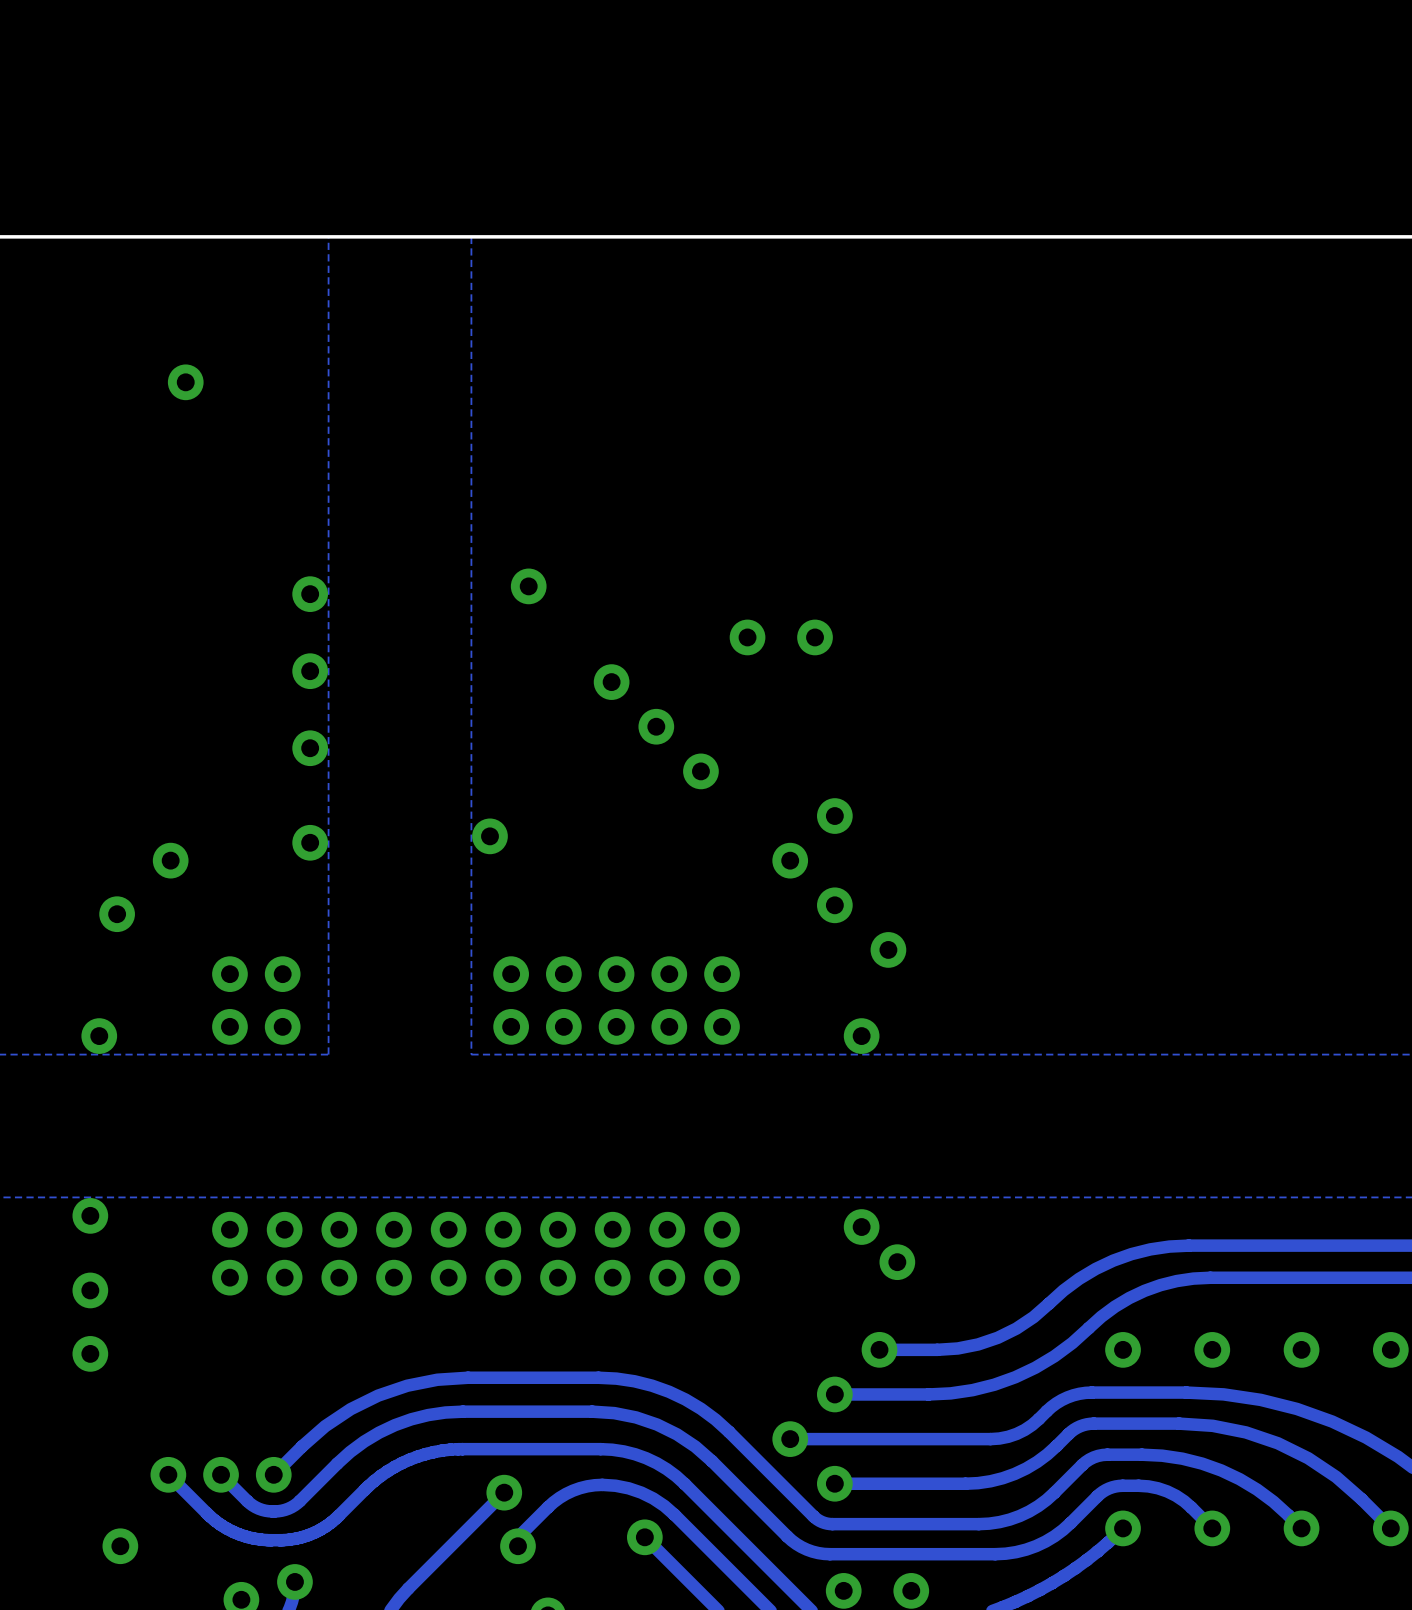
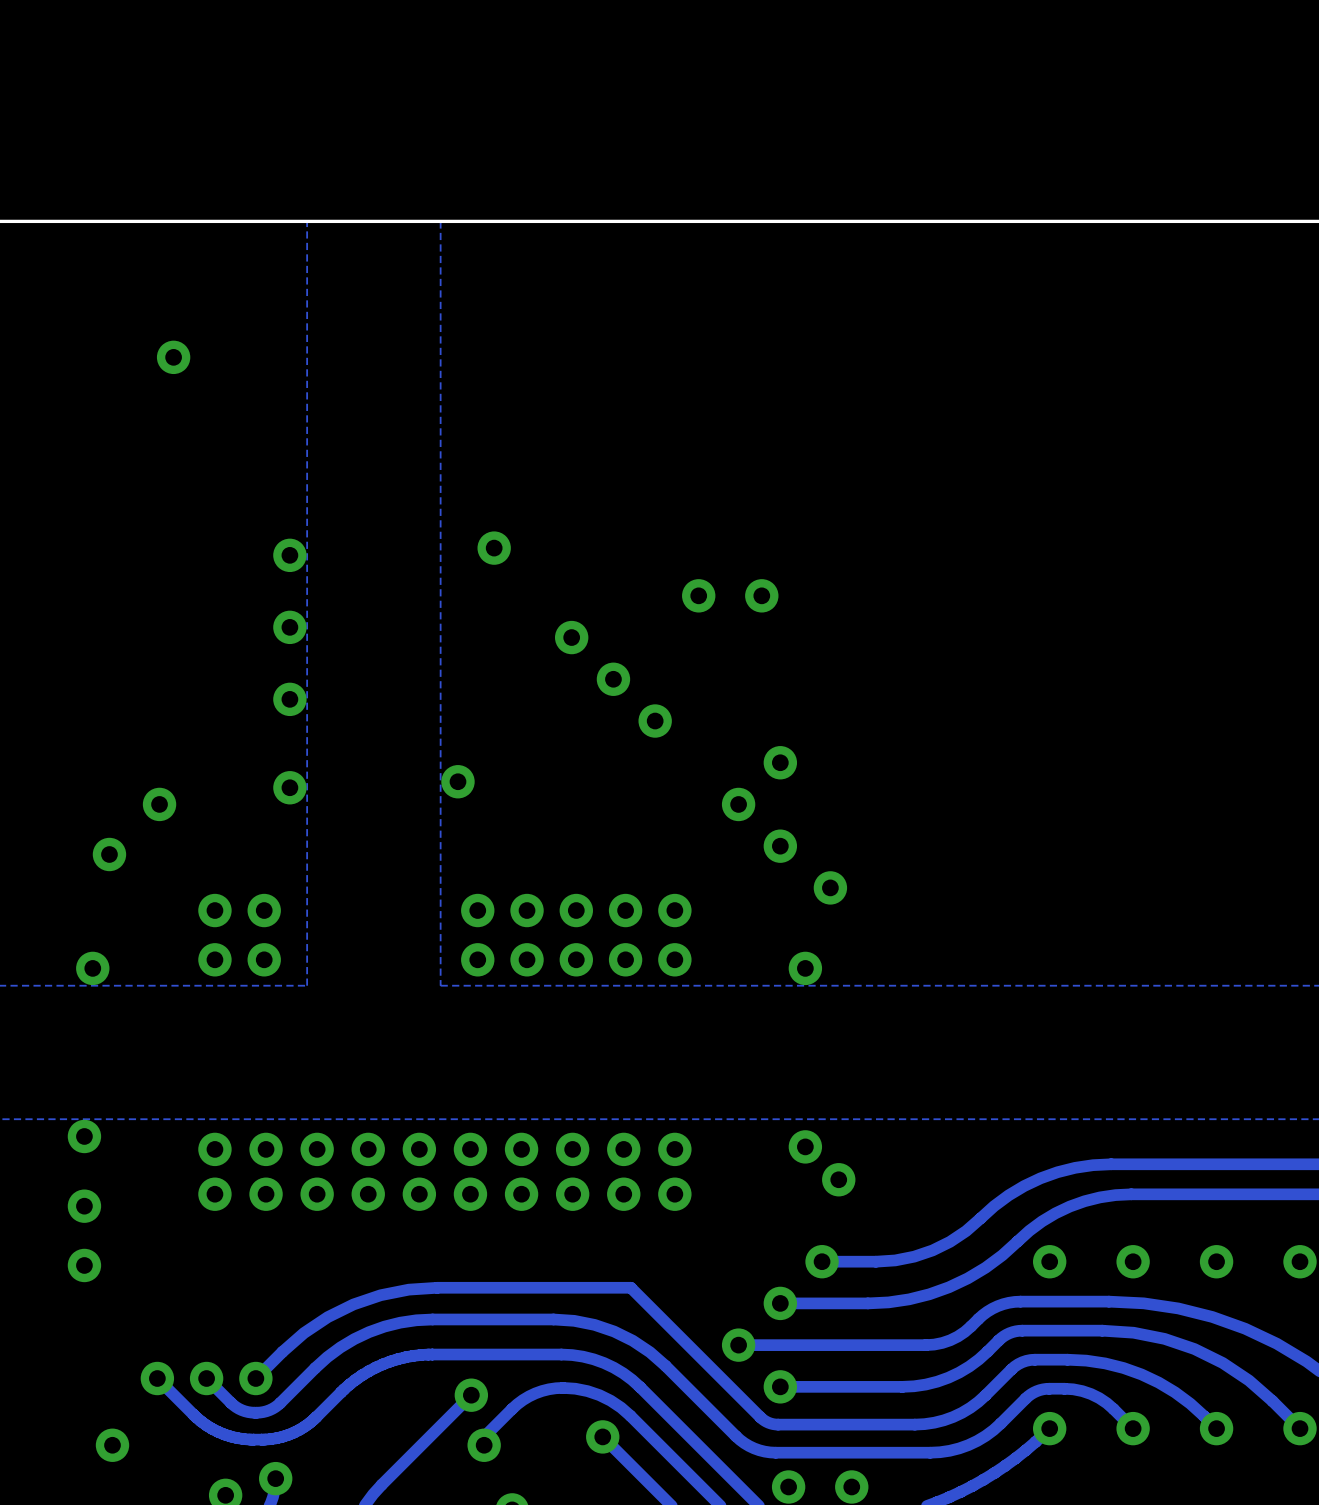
track: (598, 1377) (634, 1381) (669, 1391) (701, 1408) (728, 1431) -> (559, 1287) (630, 1287) (681, 1338)

